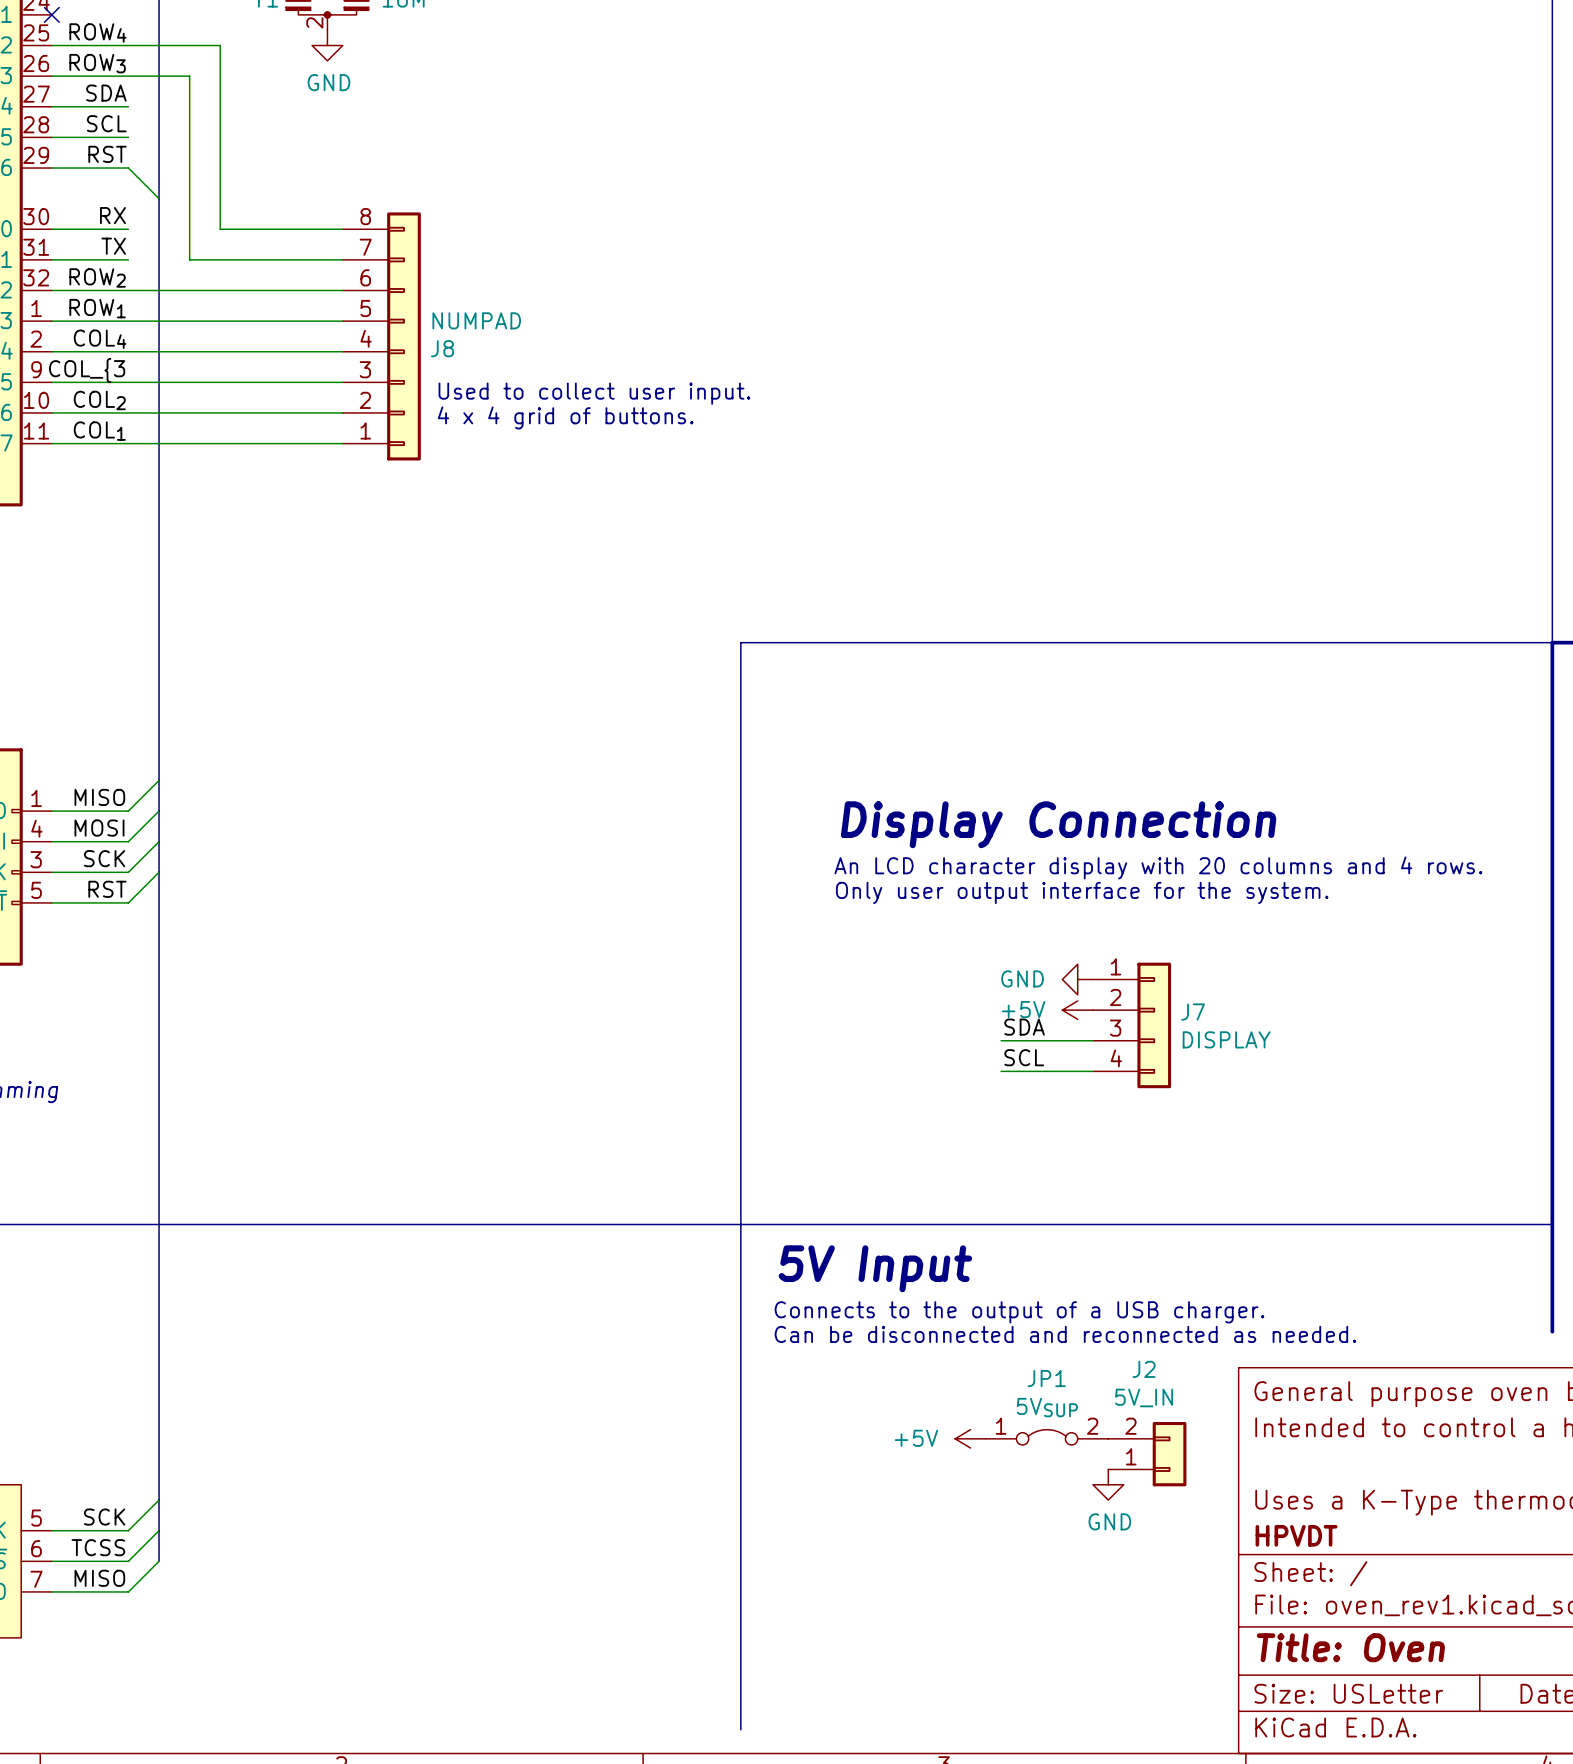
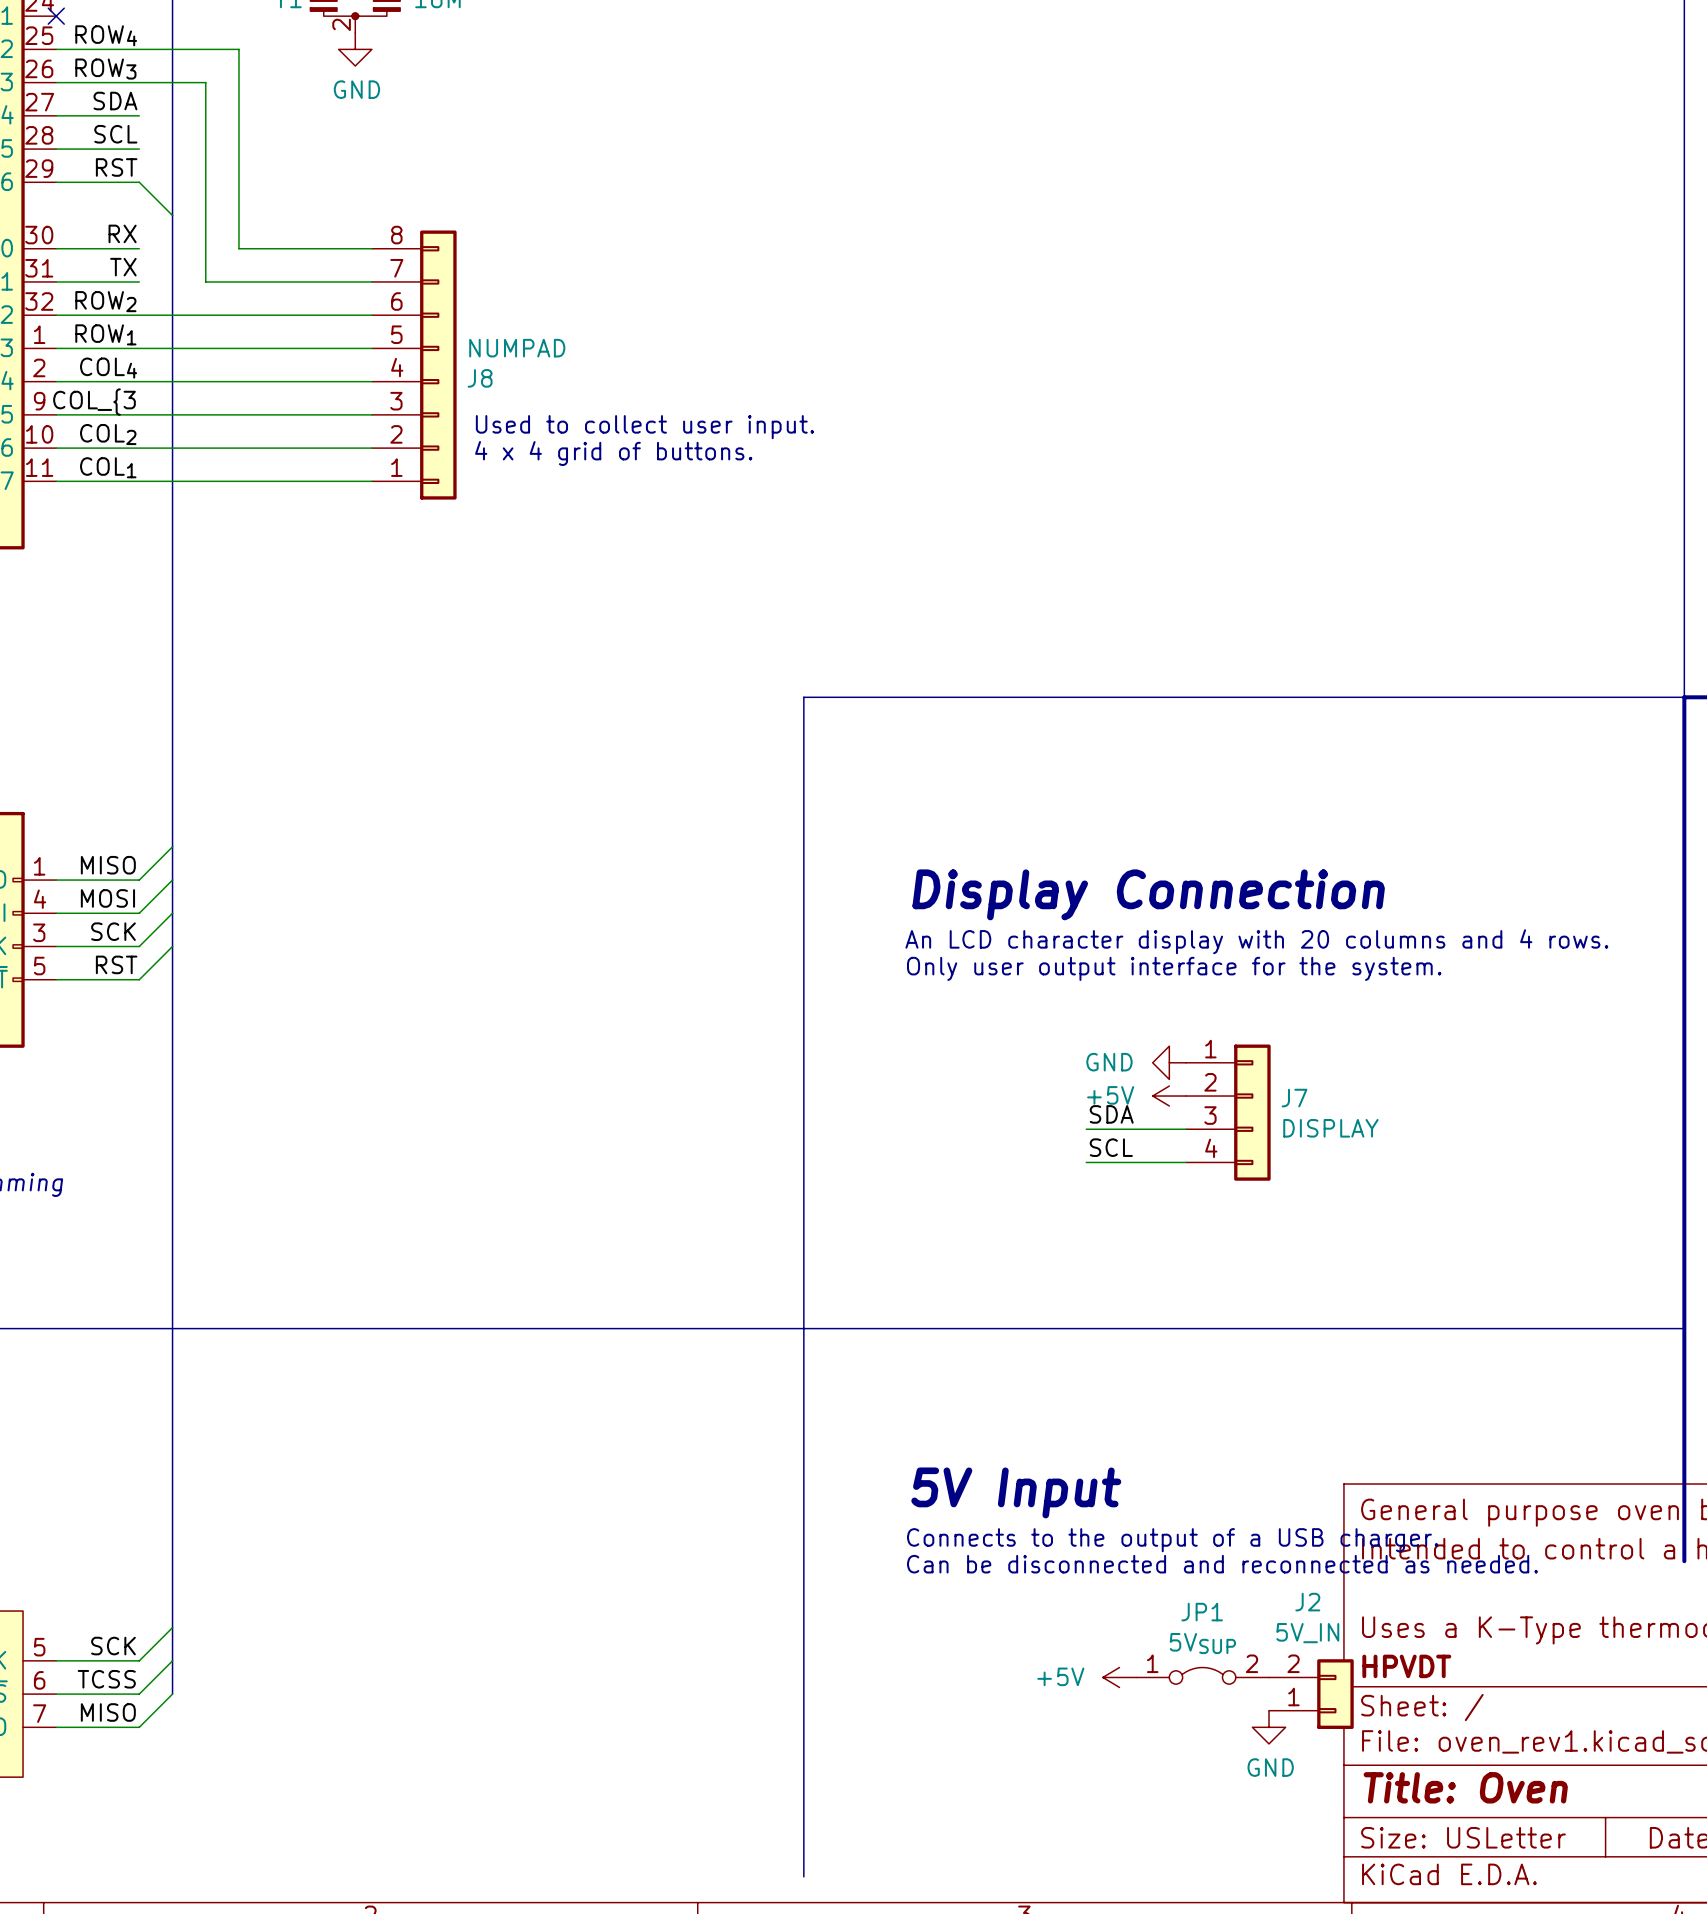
text position: 5V Input (875, 1268) -> 5V Input (1016, 1492)
text position: Connects to the output of a USB charger. (1019, 1312) -> Connects to the output of a USB charger. (1172, 1540)
line: none -> (1684, 1444) (1684, 1561)
text position: Can be disconnected and reconnected as needed. (1065, 1334) -> Can be disconnected and reconnected as needed. (1222, 1564)
JP1 position: (1047, 1437) -> (1202, 1675)
power symbol position: +5V (970, 1438) -> +5V (1119, 1677)
J2 position: (1147, 1454) -> (1311, 1694)
power symbol position: GND (1108, 1484) -> GND (1269, 1727)

